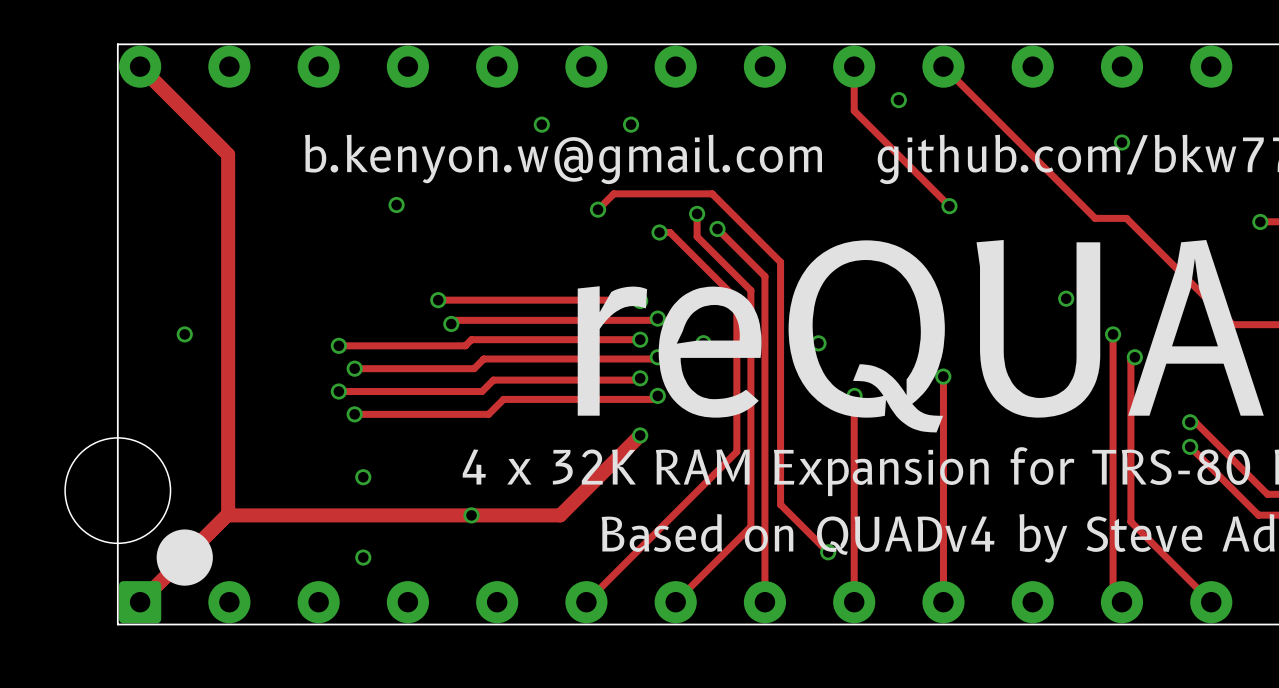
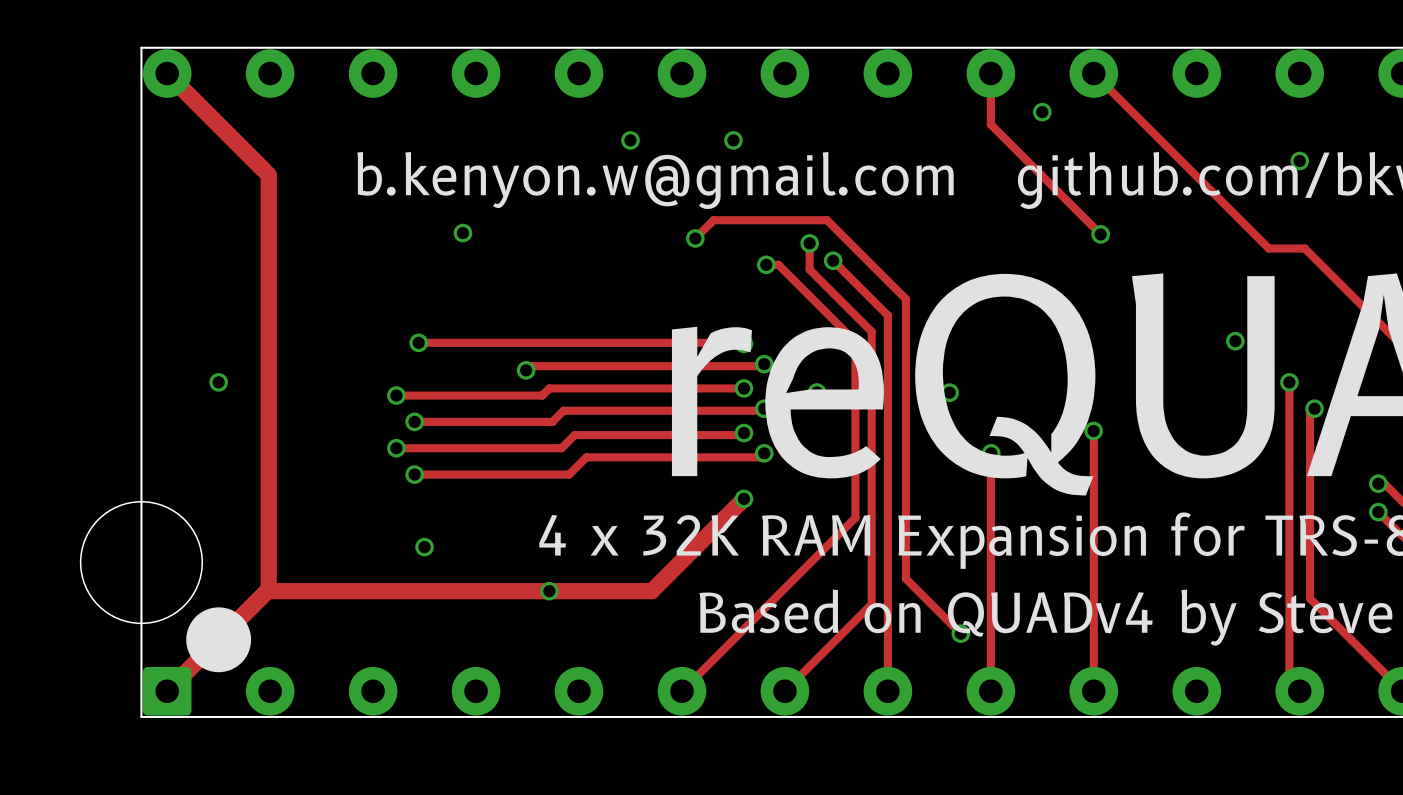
track: none -> (418, 342) (511, 342)
via position: (438, 300) -> (418, 342)
via: (363, 557) -> none

